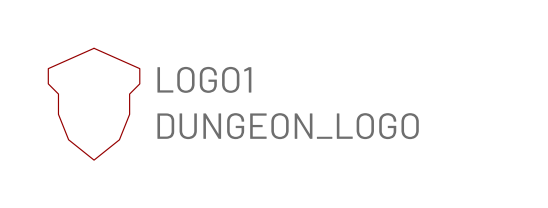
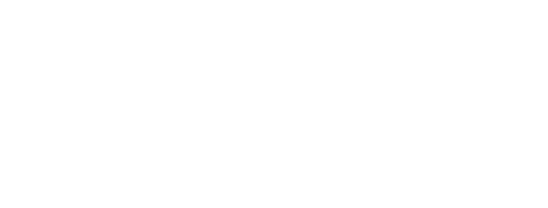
LOGO1: DUNGEON_LOGO (94, 104) -> none

